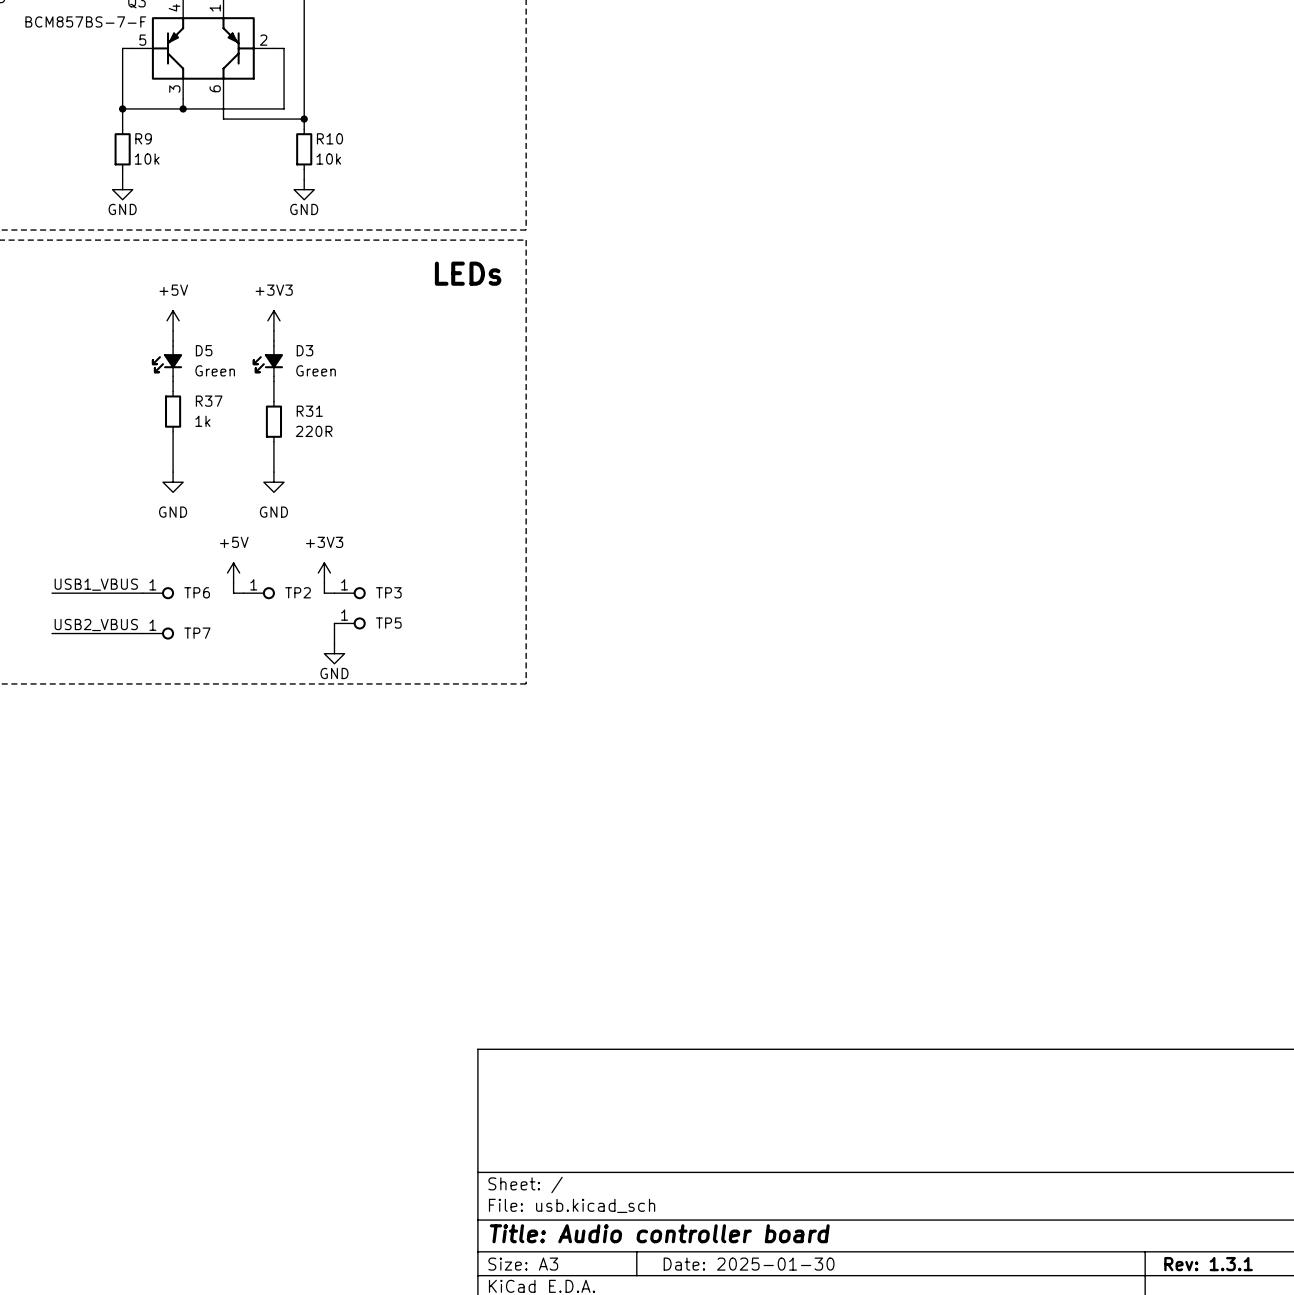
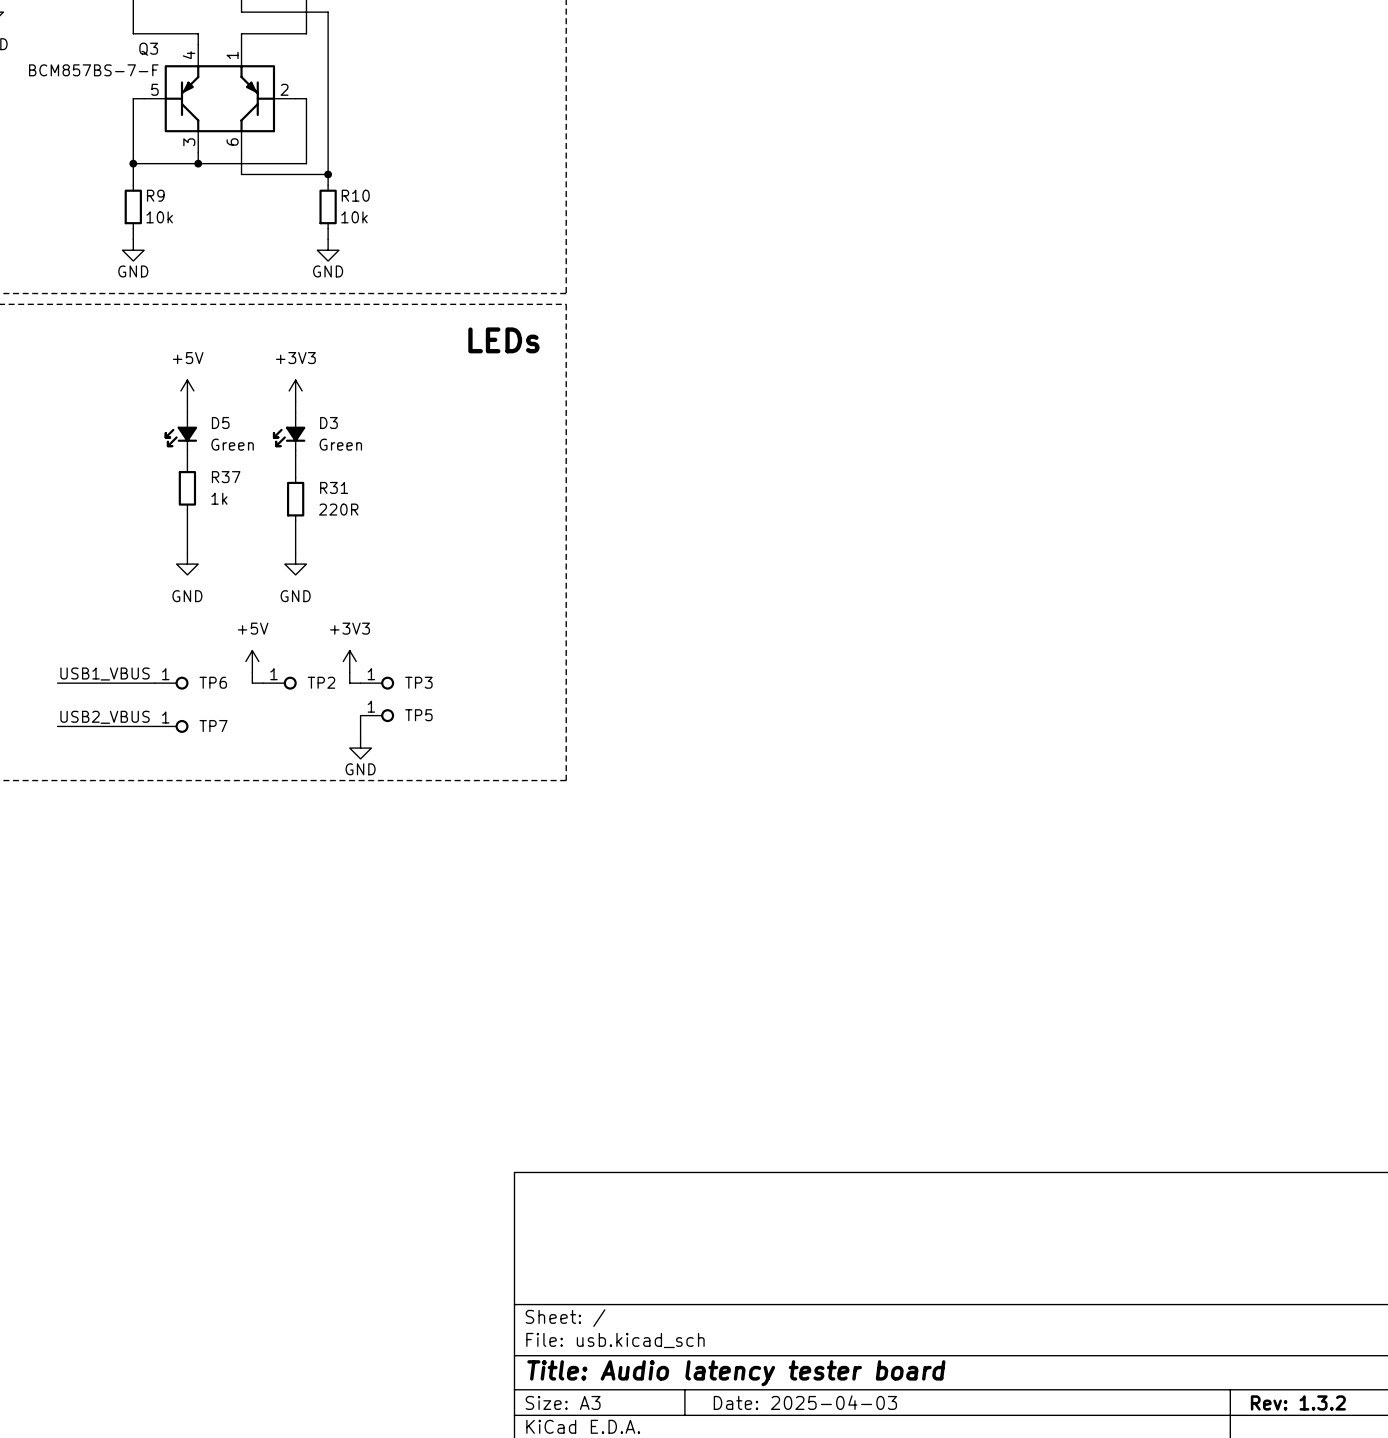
title block: Title: Audio controller board (659, 1233) -> Title: Audio latency tester board (736, 1373)
title block: Date: 2025-01-30 (749, 1264) -> Date: 2025-04-03 (805, 1402)
title block: Rev: 1.3.1 (1208, 1264) -> Rev: 1.3.2 (1298, 1402)

